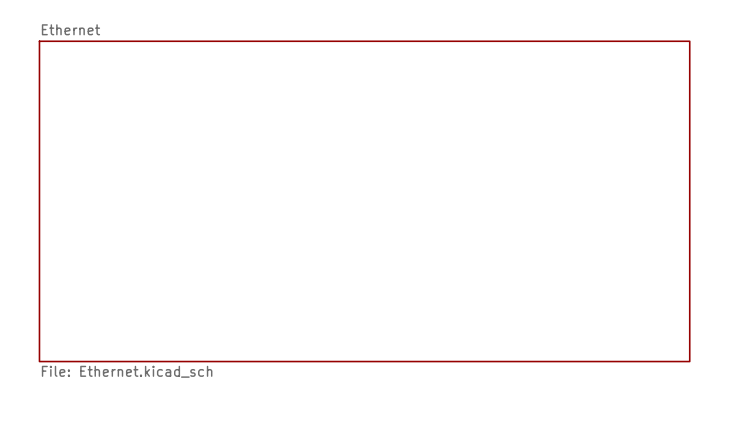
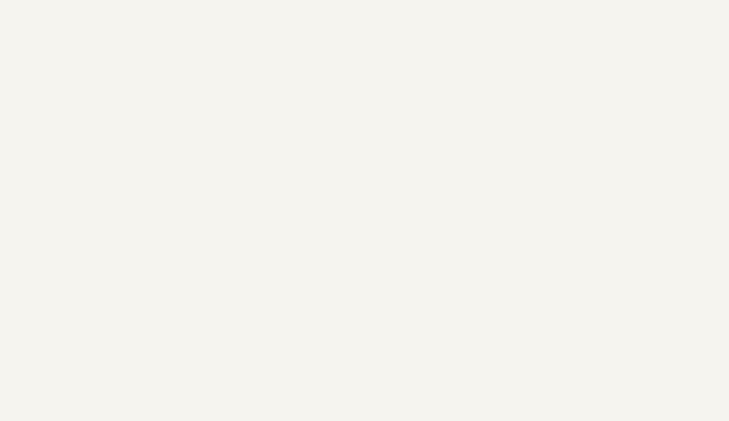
sheet Ethernet: File: Ethernet.kicad_sch (364, 201) -> none

